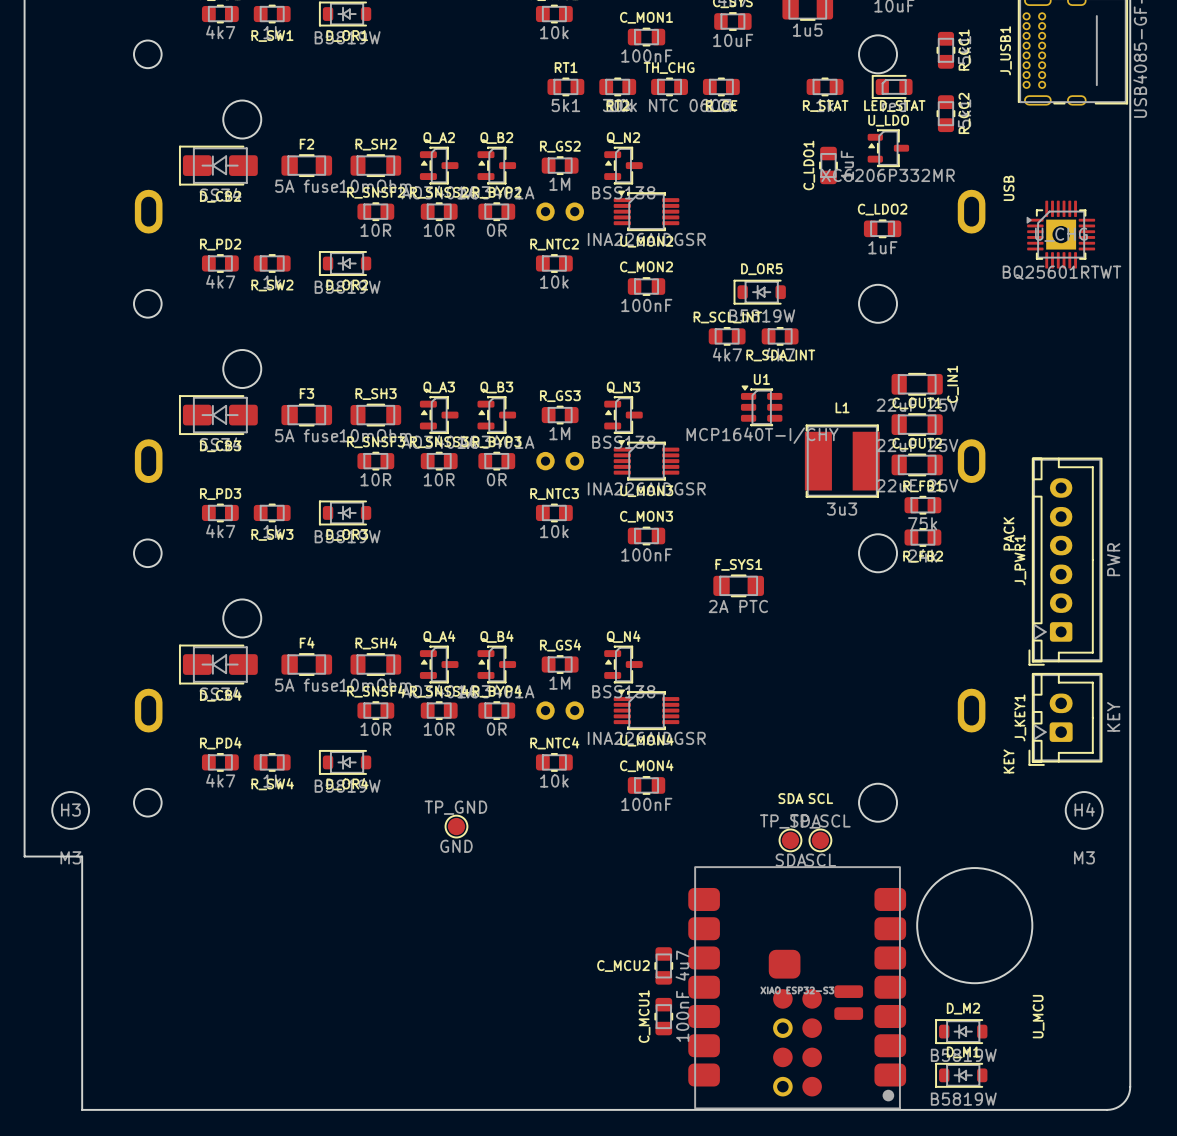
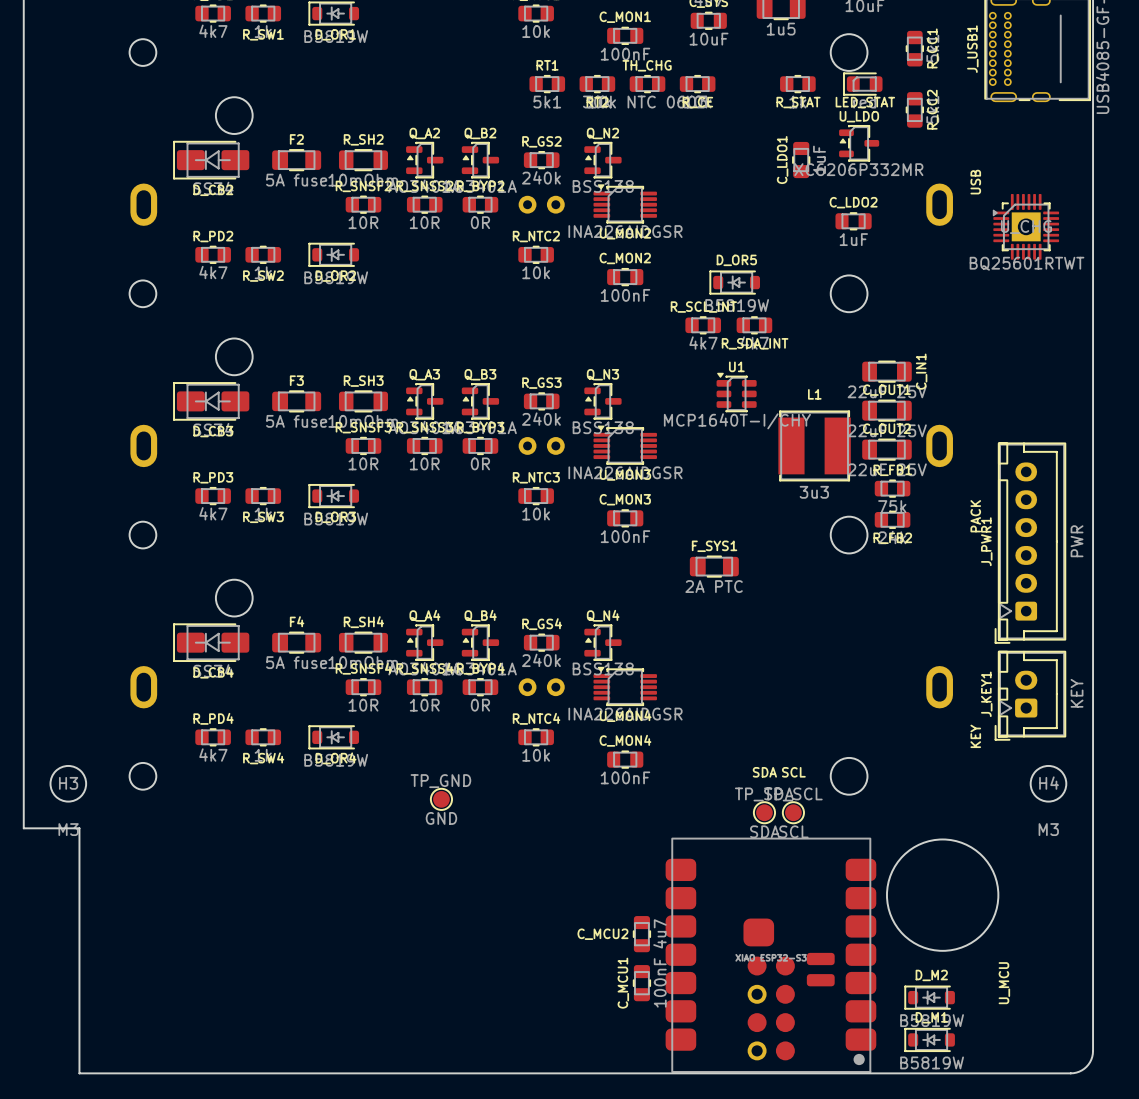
R_GS2 value: 1M (559, 184) -> 240k (541, 177)
R_GS3 value: 1M (559, 433) -> 240k (541, 419)
R_GS4 value: 1M (559, 683) -> 240k (541, 660)

